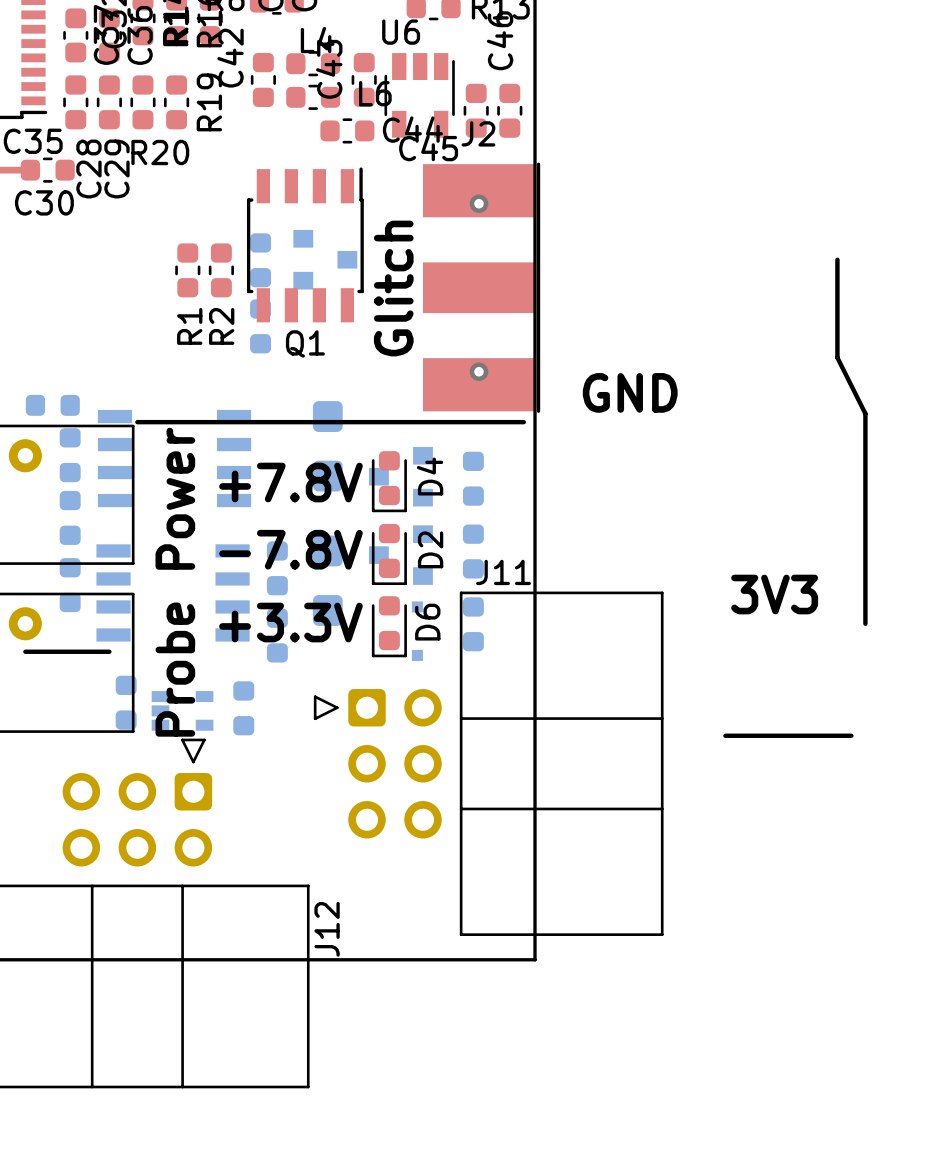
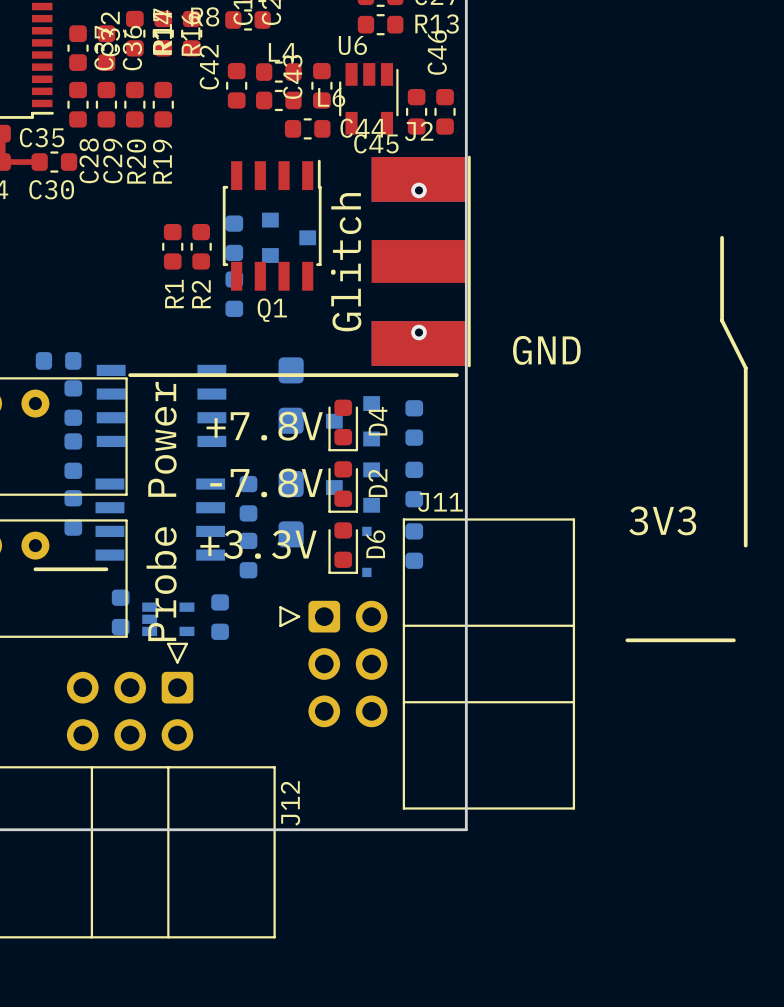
R19 name position: R19 (209, 102) -> R19 (162, 161)
R20 name rotation: 0° (160, 152) -> 90° counterclockwise (136, 161)

